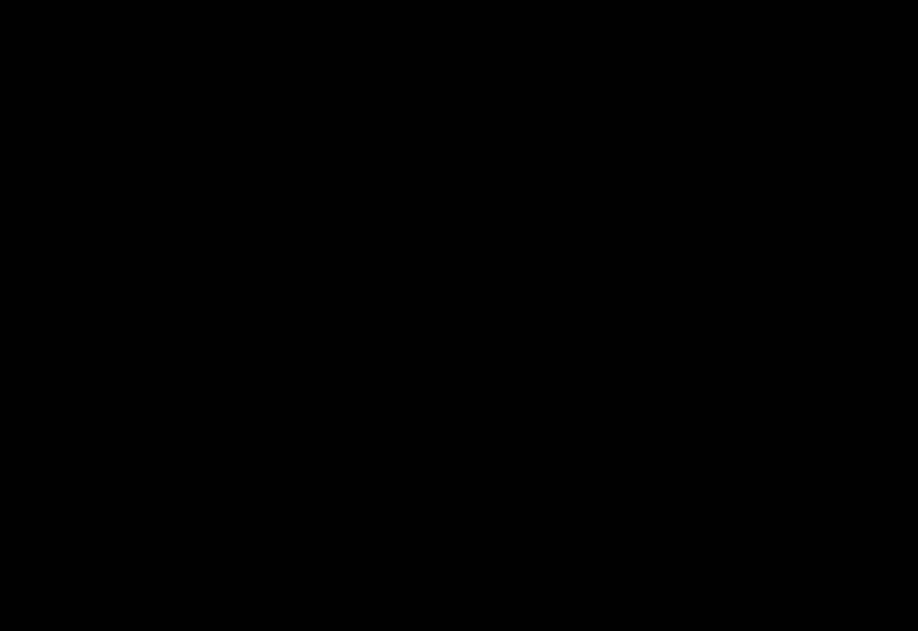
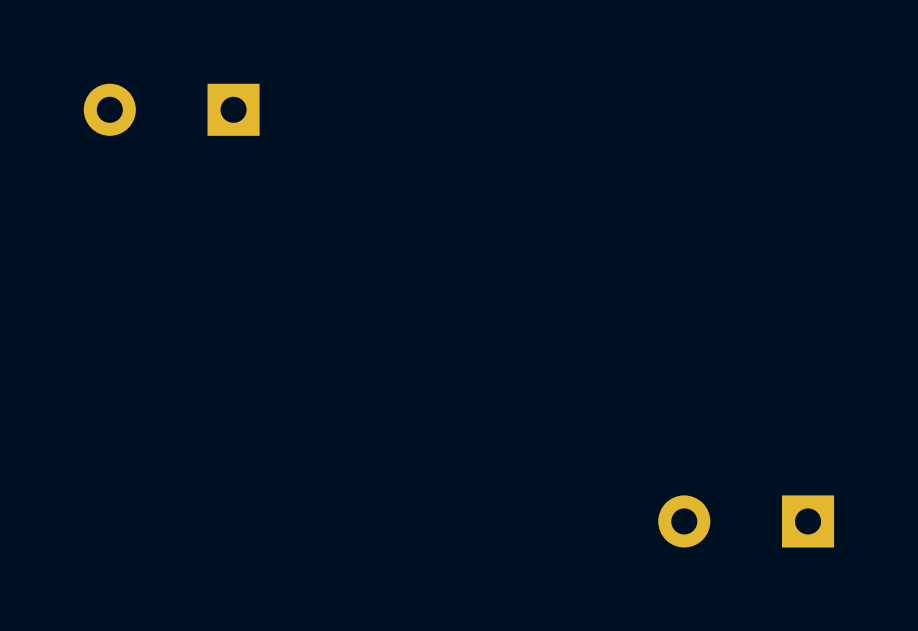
part: none -> (171, 109)
part: none -> (746, 521)

